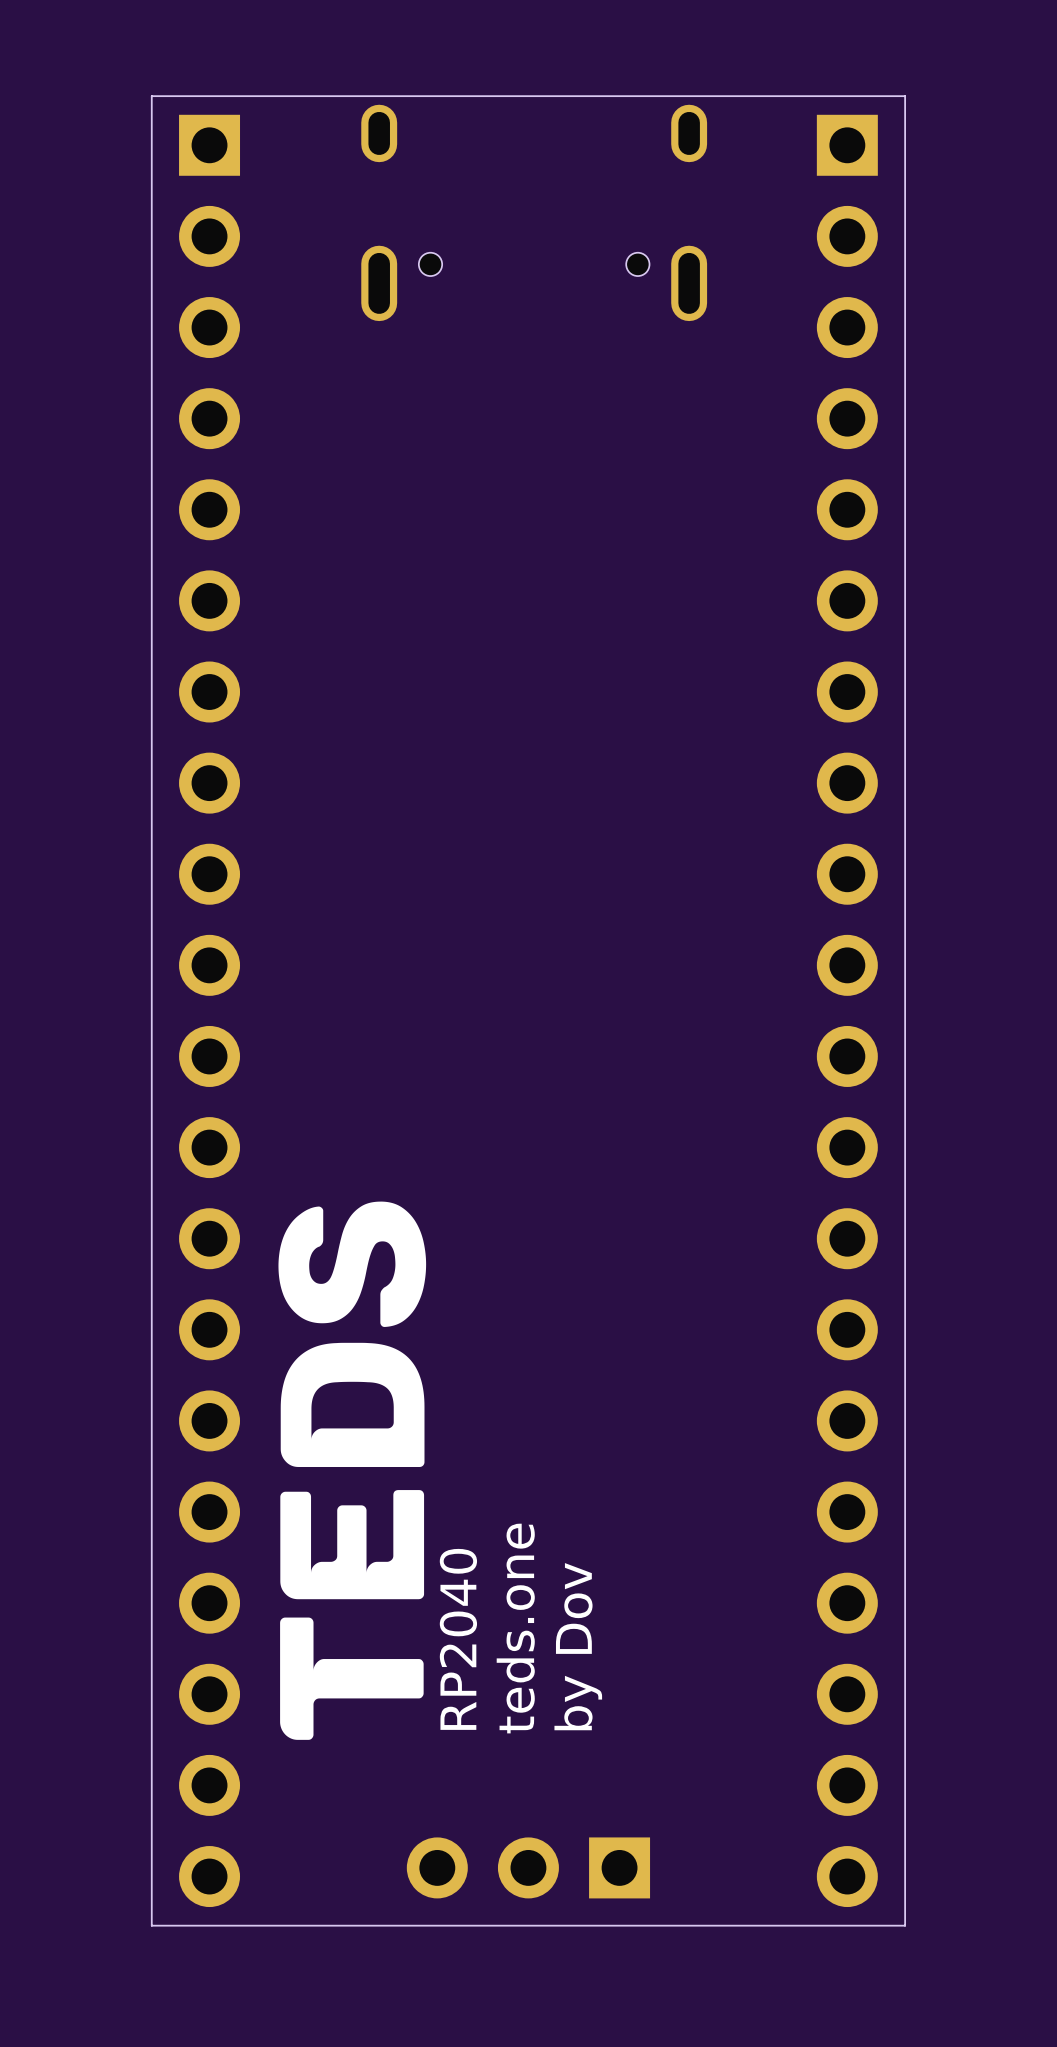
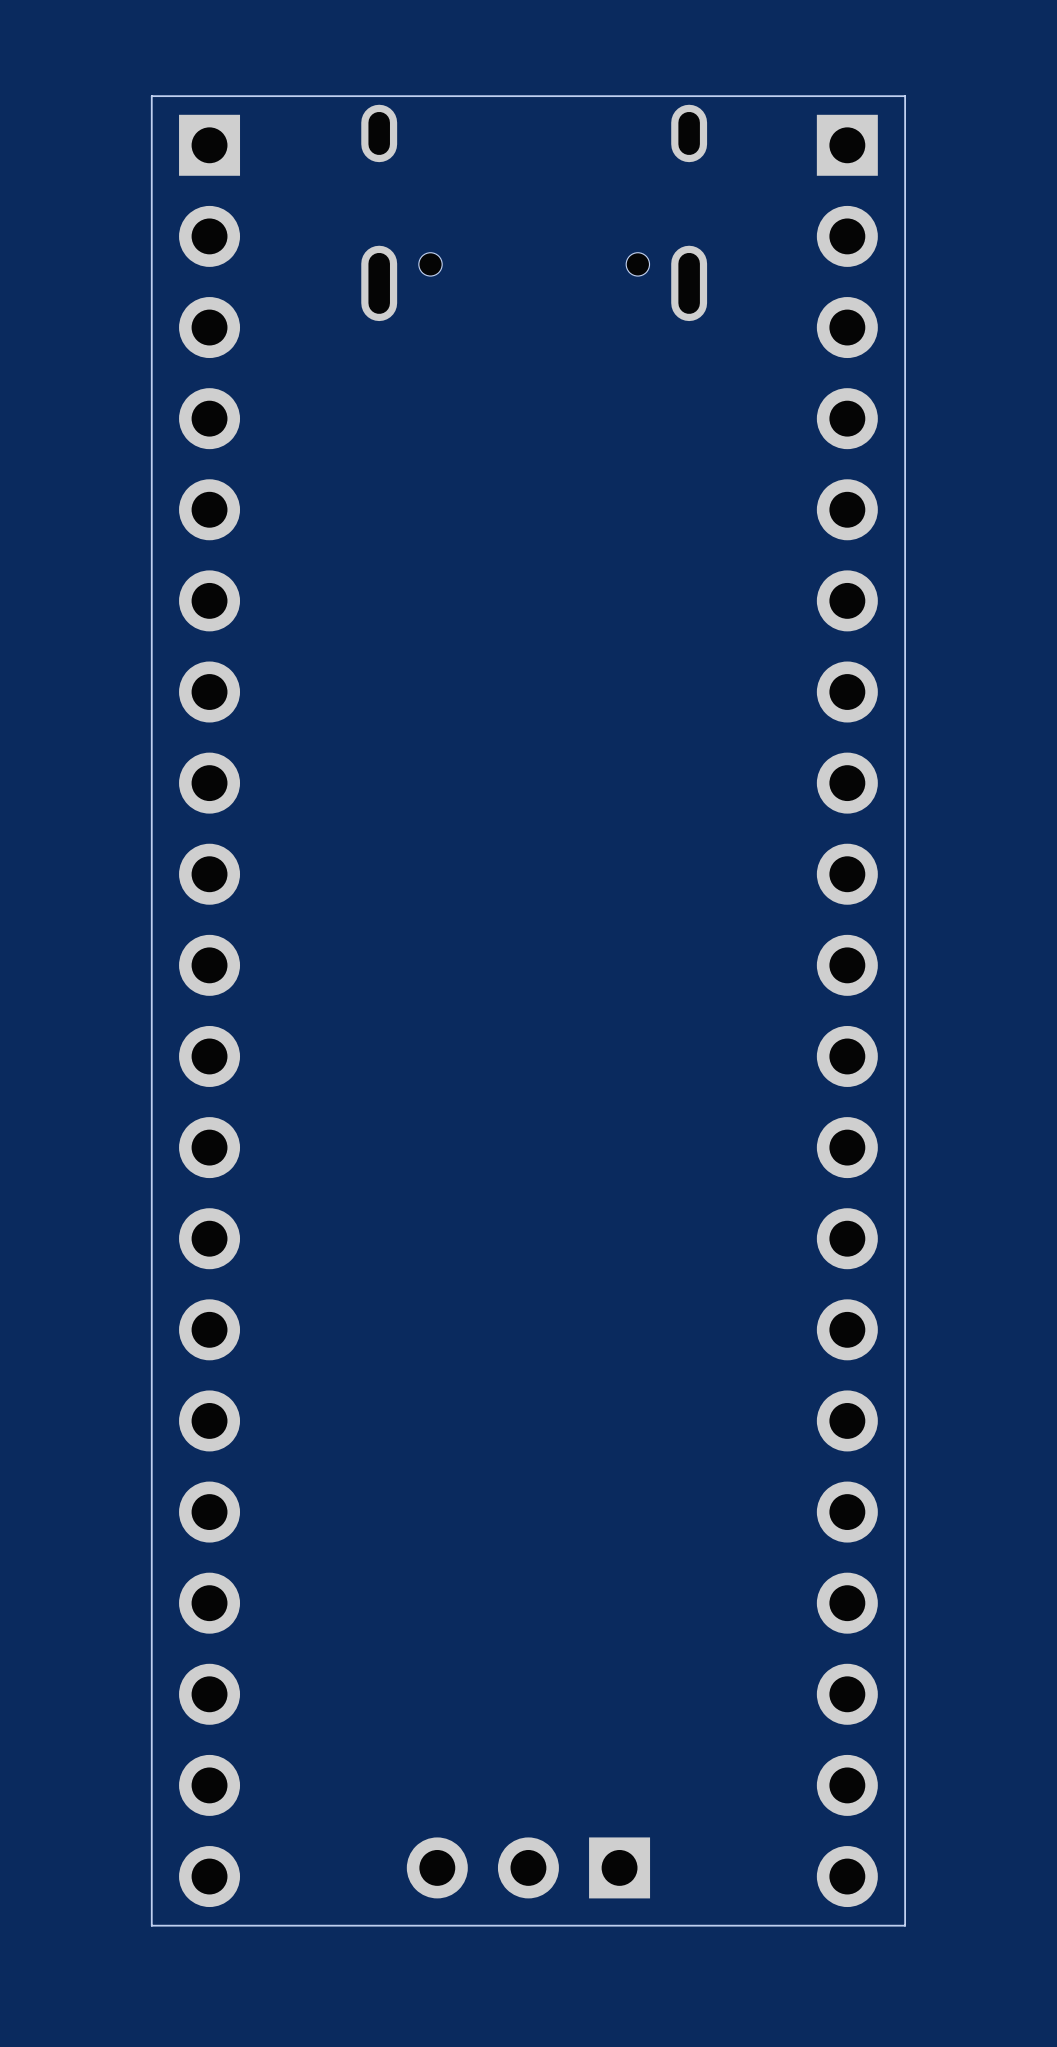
drawing: [278, 1201, 427, 1740] -> none
text: teds.one (515, 1628) -> none
text: RP2040 (458, 1639) -> none
text: by Dov (578, 1646) -> none

